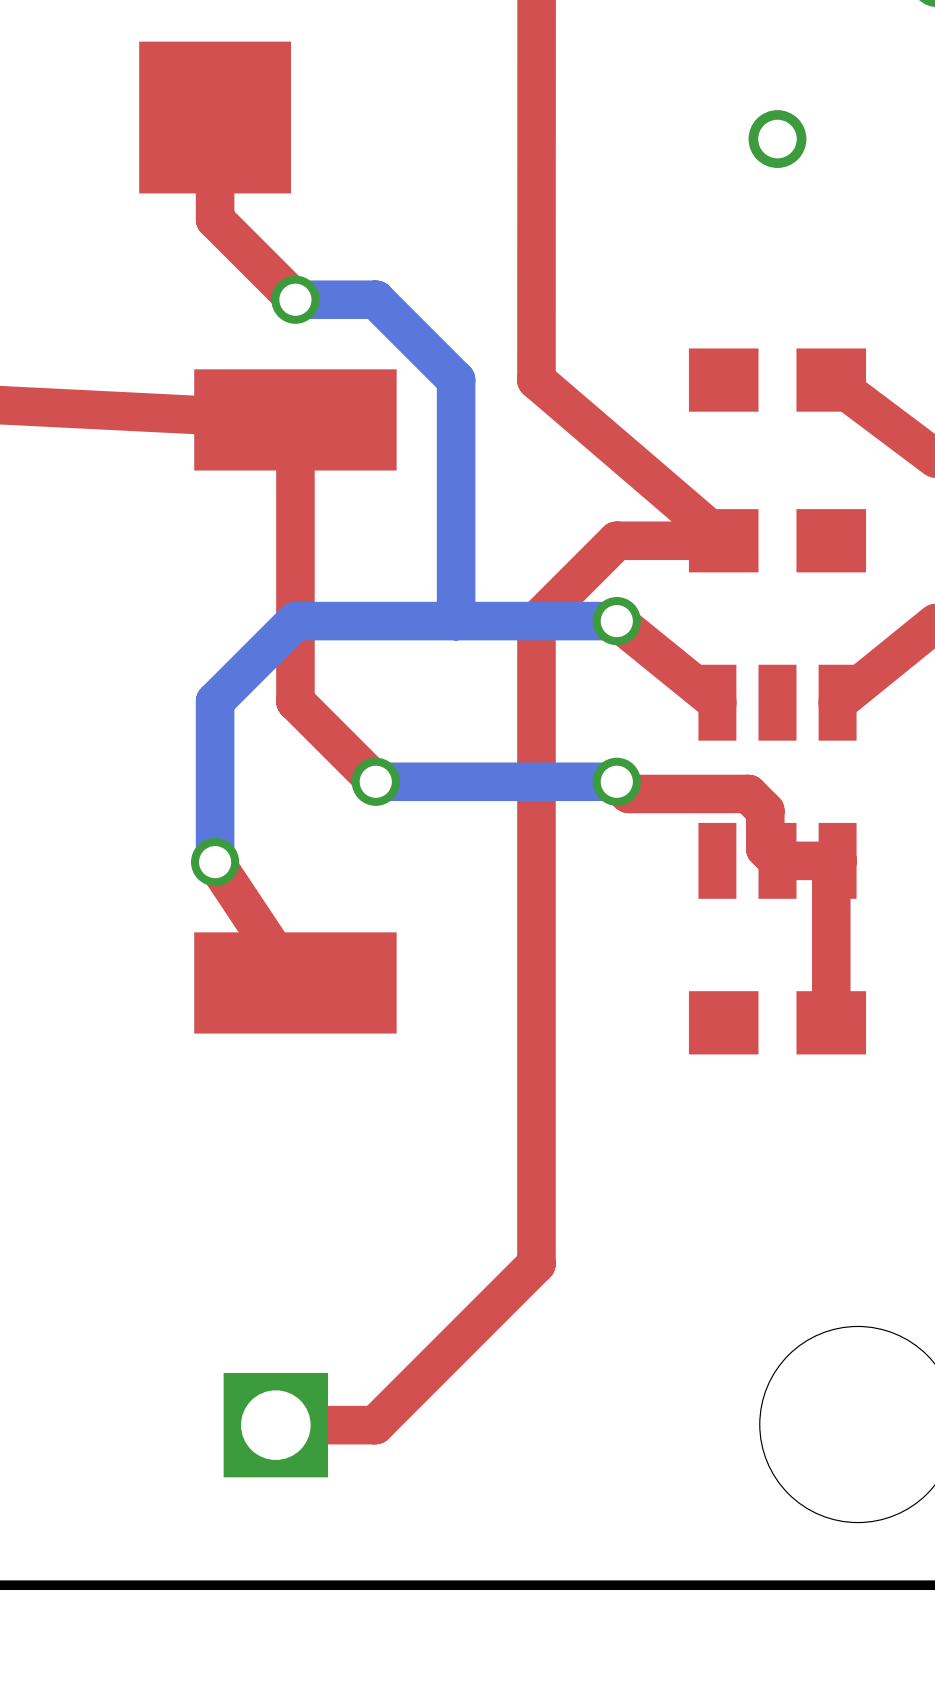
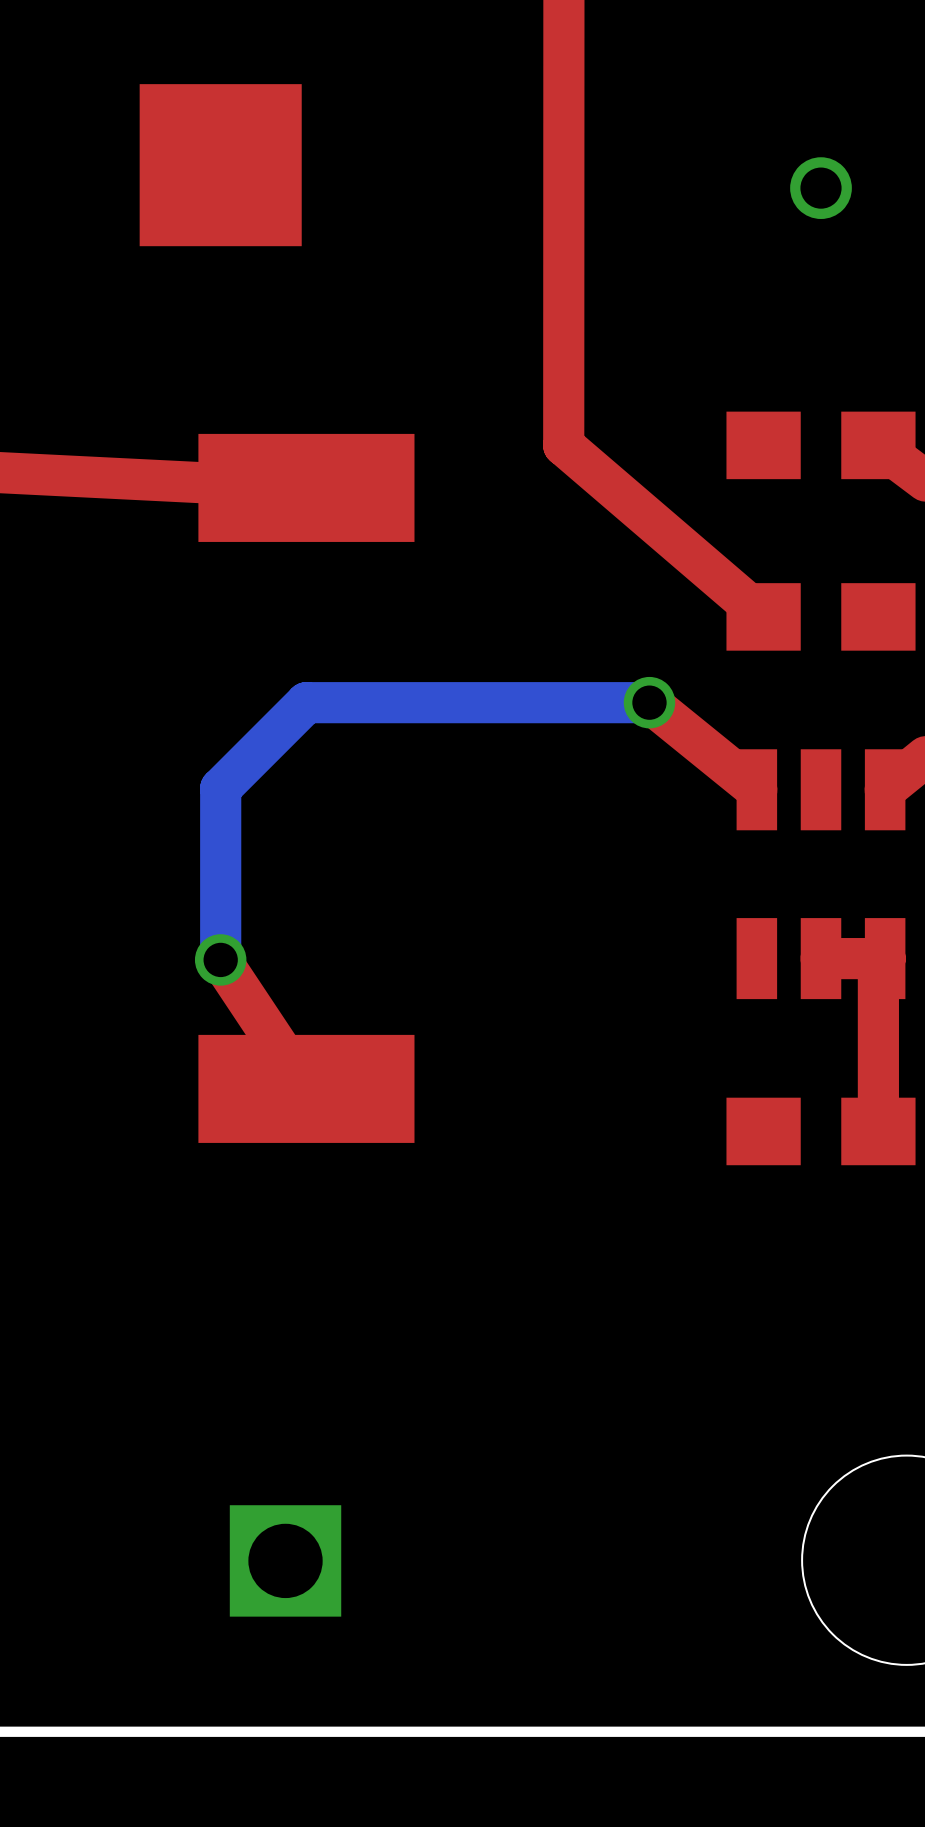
top track: (215, 117) (215, 219) (295, 299) -> none
bottom track: (295, 299) (375, 299) (456, 380) (456, 621) -> none
via: (295, 299) -> none
top track: (295, 419) (295, 701) (375, 781) -> none
top track: (723, 540) (616, 540) (536, 621) (536, 1263) (375, 1425) (275, 1425) -> none
via: (375, 781) -> none
top track: (616, 781) (629, 793) (748, 793) (765, 810) (765, 848) (777, 860) -> none
bottom track: (616, 781) (375, 781) -> none
via: (616, 781) -> none

